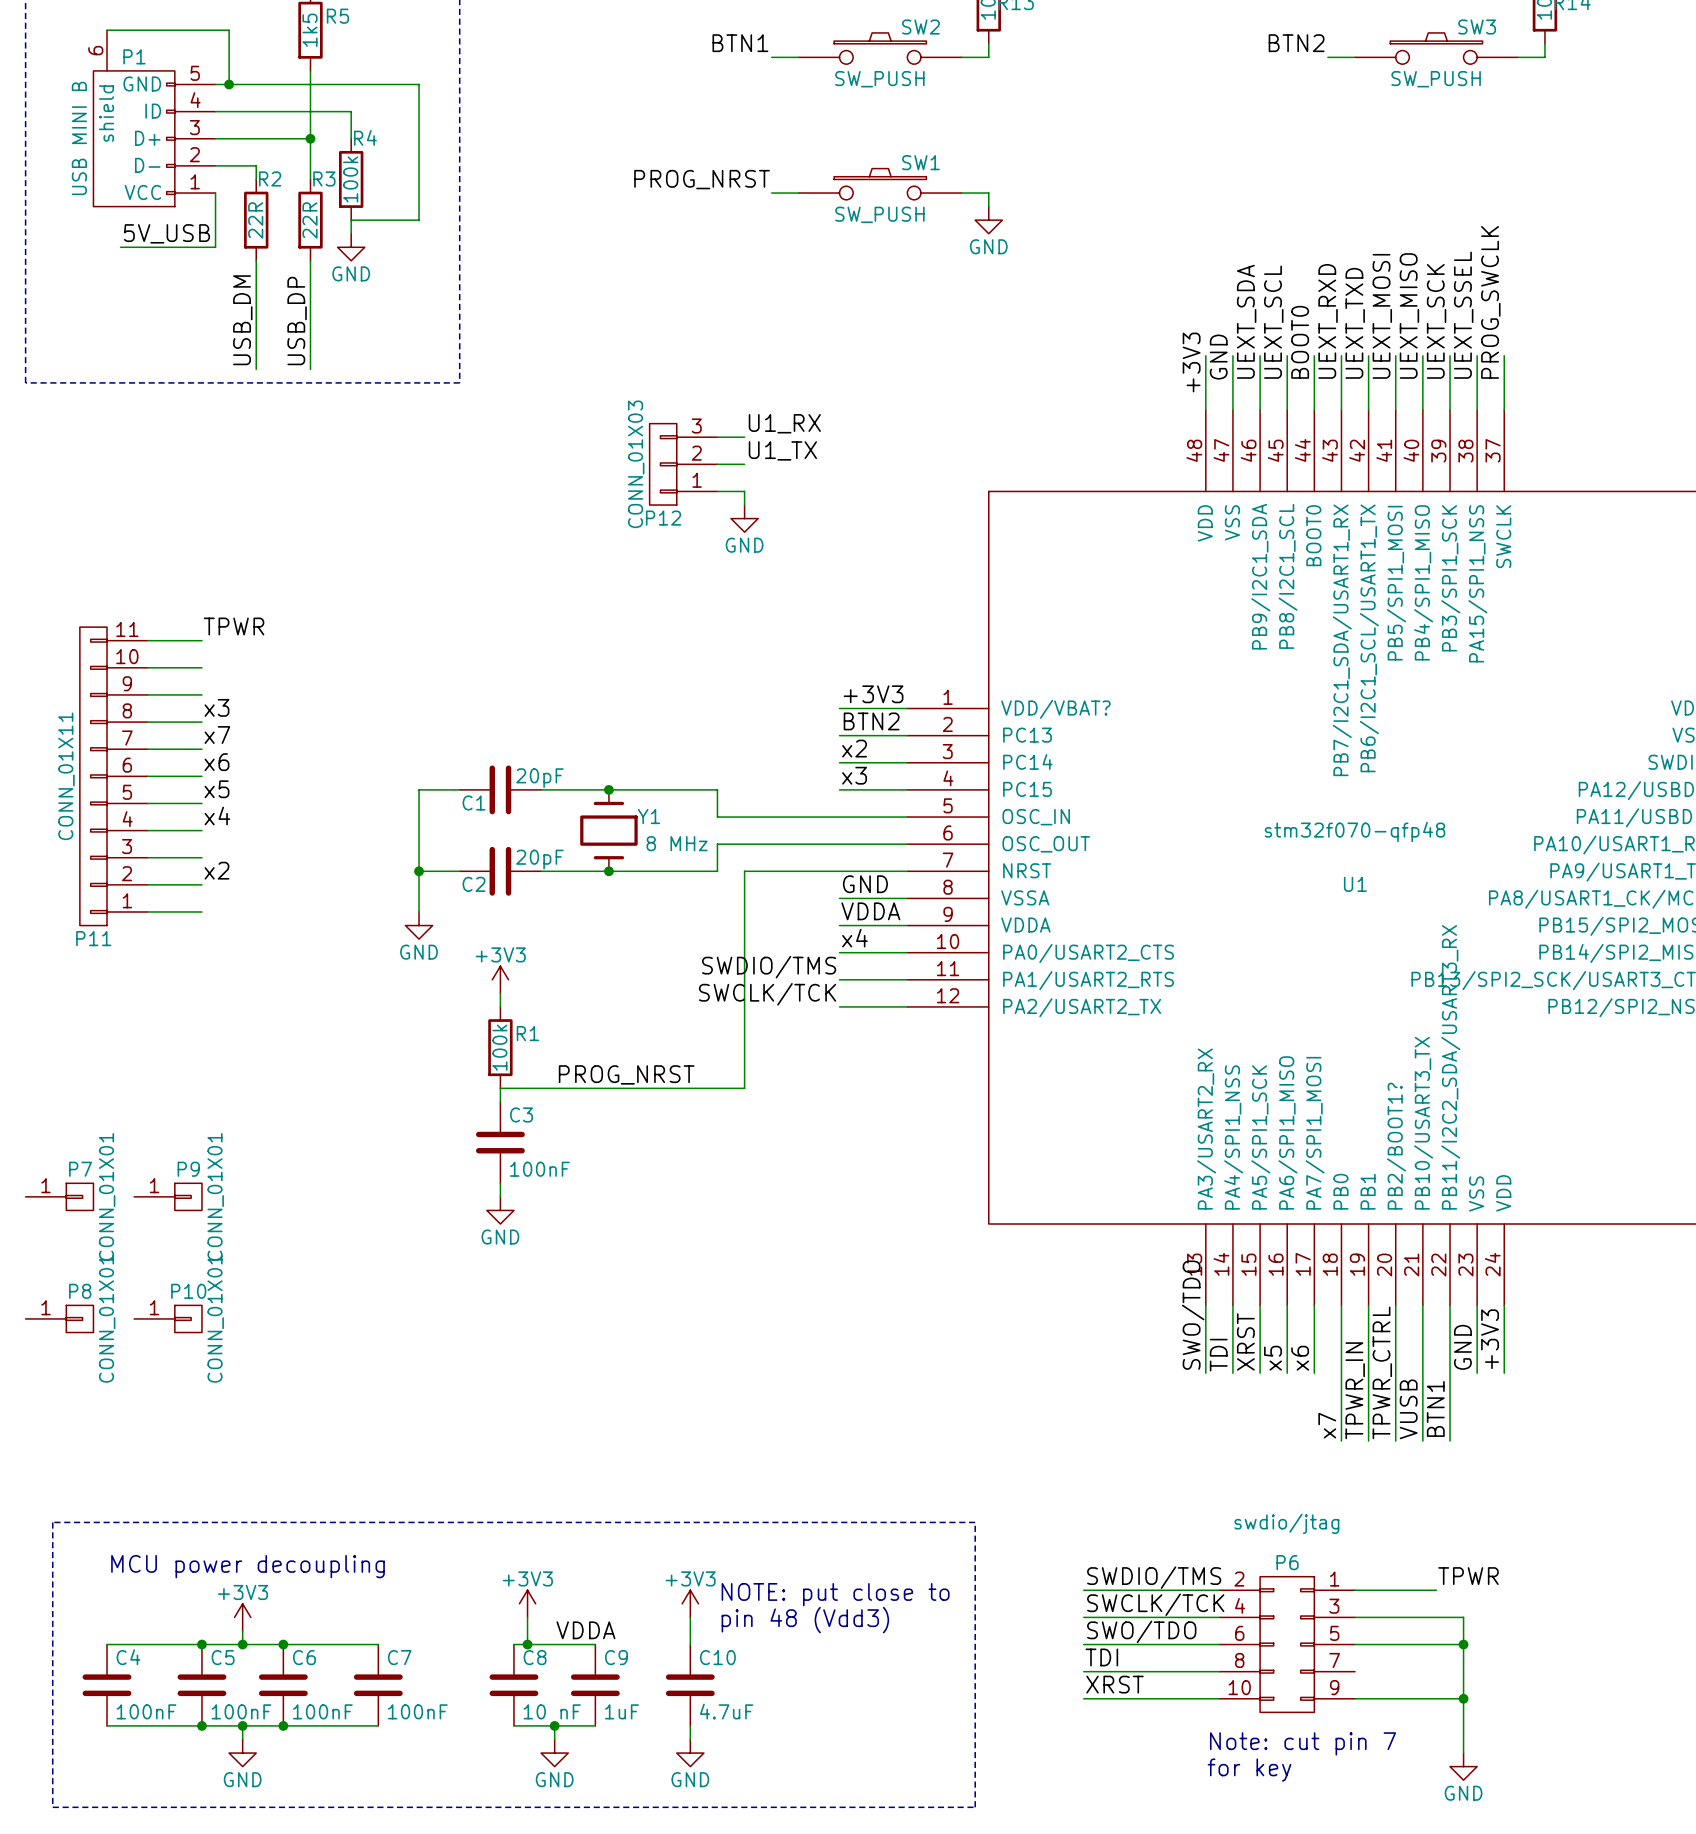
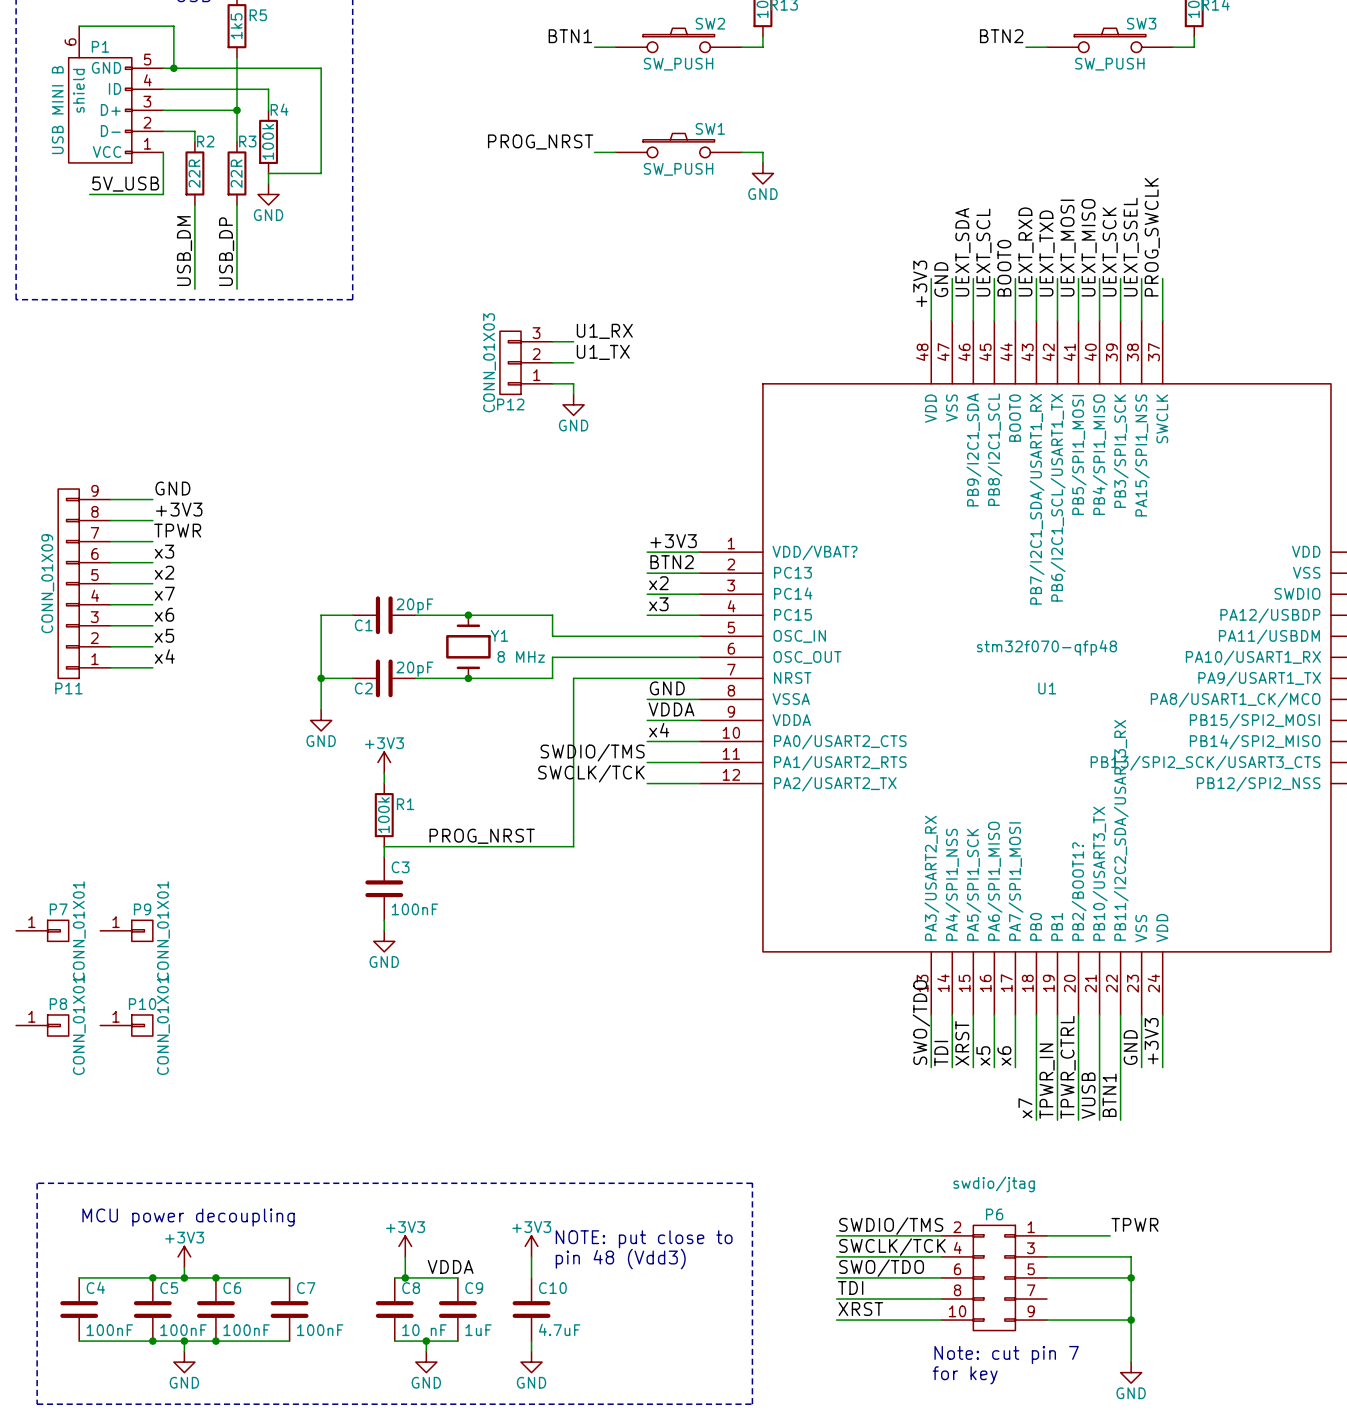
label: TPWR (234, 626) -> GND (172, 488)
P11 symbol: [79, 627, 148, 926] -> [58, 489, 111, 679]
label: none -> +3V3 (179, 509)
label: none -> TPWR (177, 530)
label: x7 (217, 735) -> x2 (164, 572)
label: x6 (216, 762) -> x7 (164, 593)
P11 value: CONN_01X11 (66, 776) -> CONN_01X09 (47, 583)
label: x5 (216, 789) -> x6 (164, 614)
label: x4 (217, 816) -> x5 (164, 635)
label: none -> x4 (164, 656)
label: x2 (216, 870) -> none
wire: (147, 884) (201, 884) -> none
wire: (147, 911) (201, 911) -> none
P11 name position: P11 (93, 938) -> P11 (68, 688)

